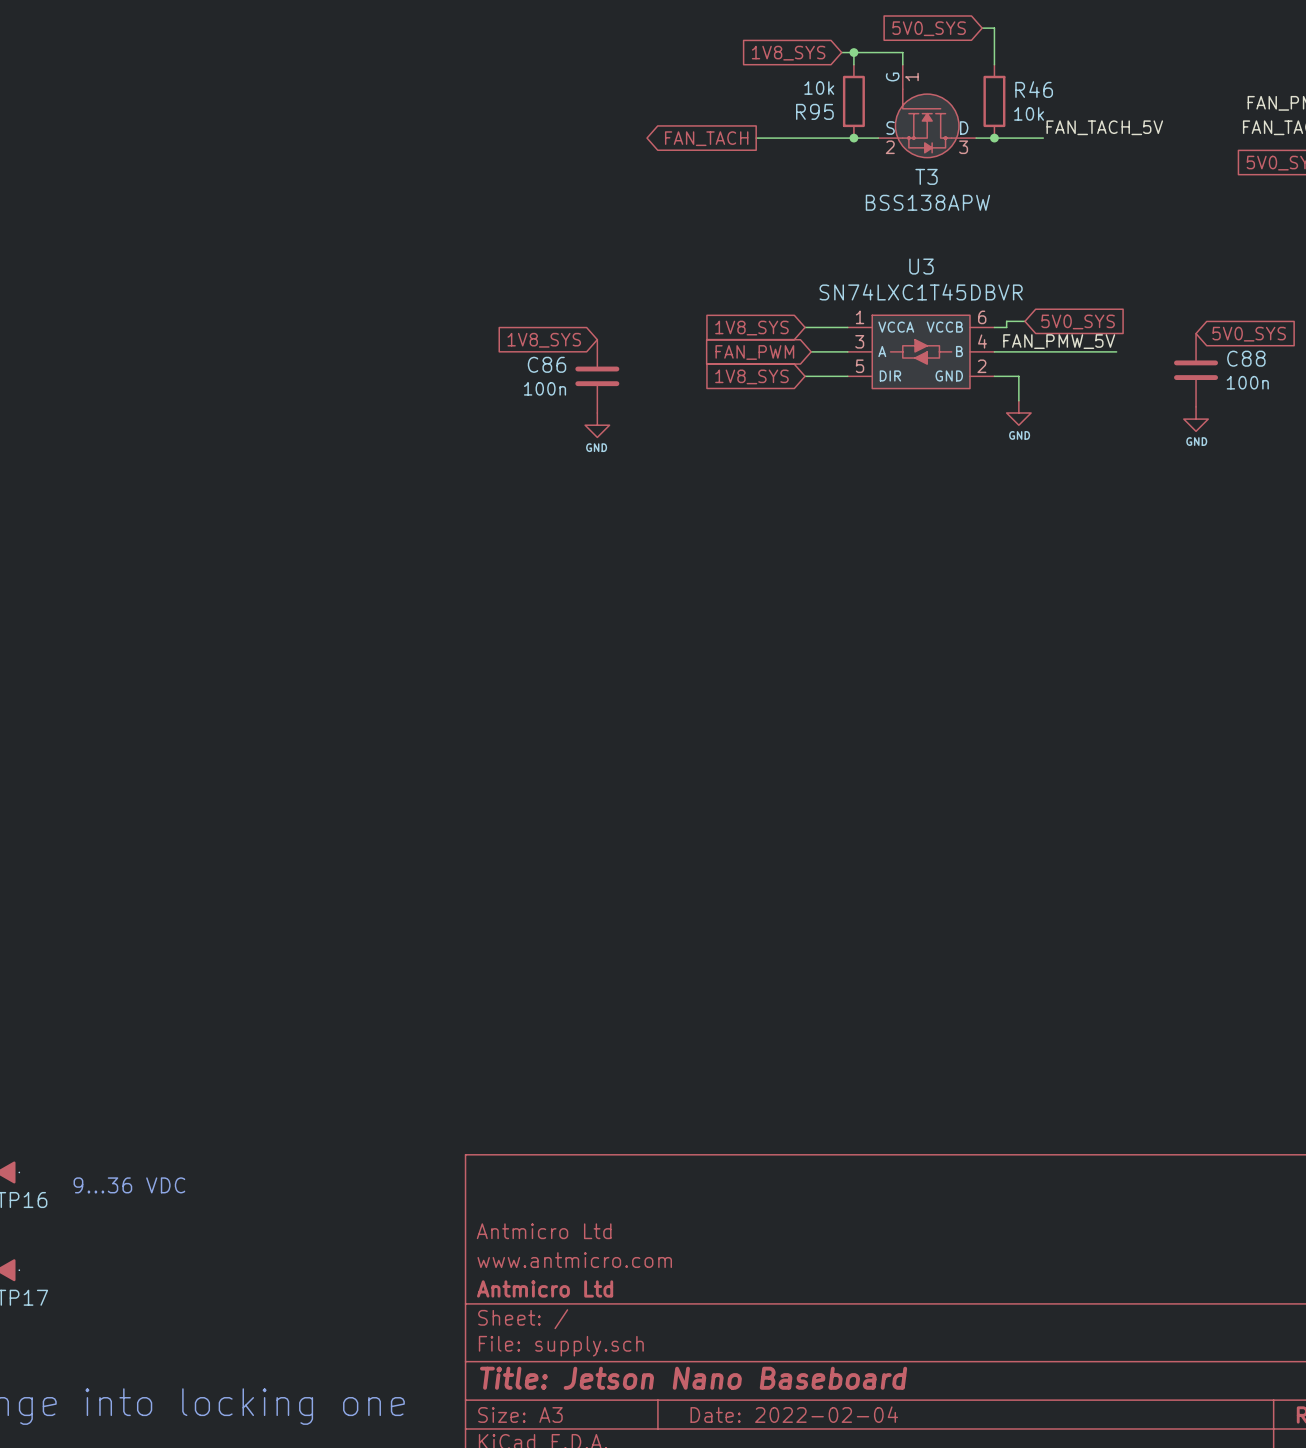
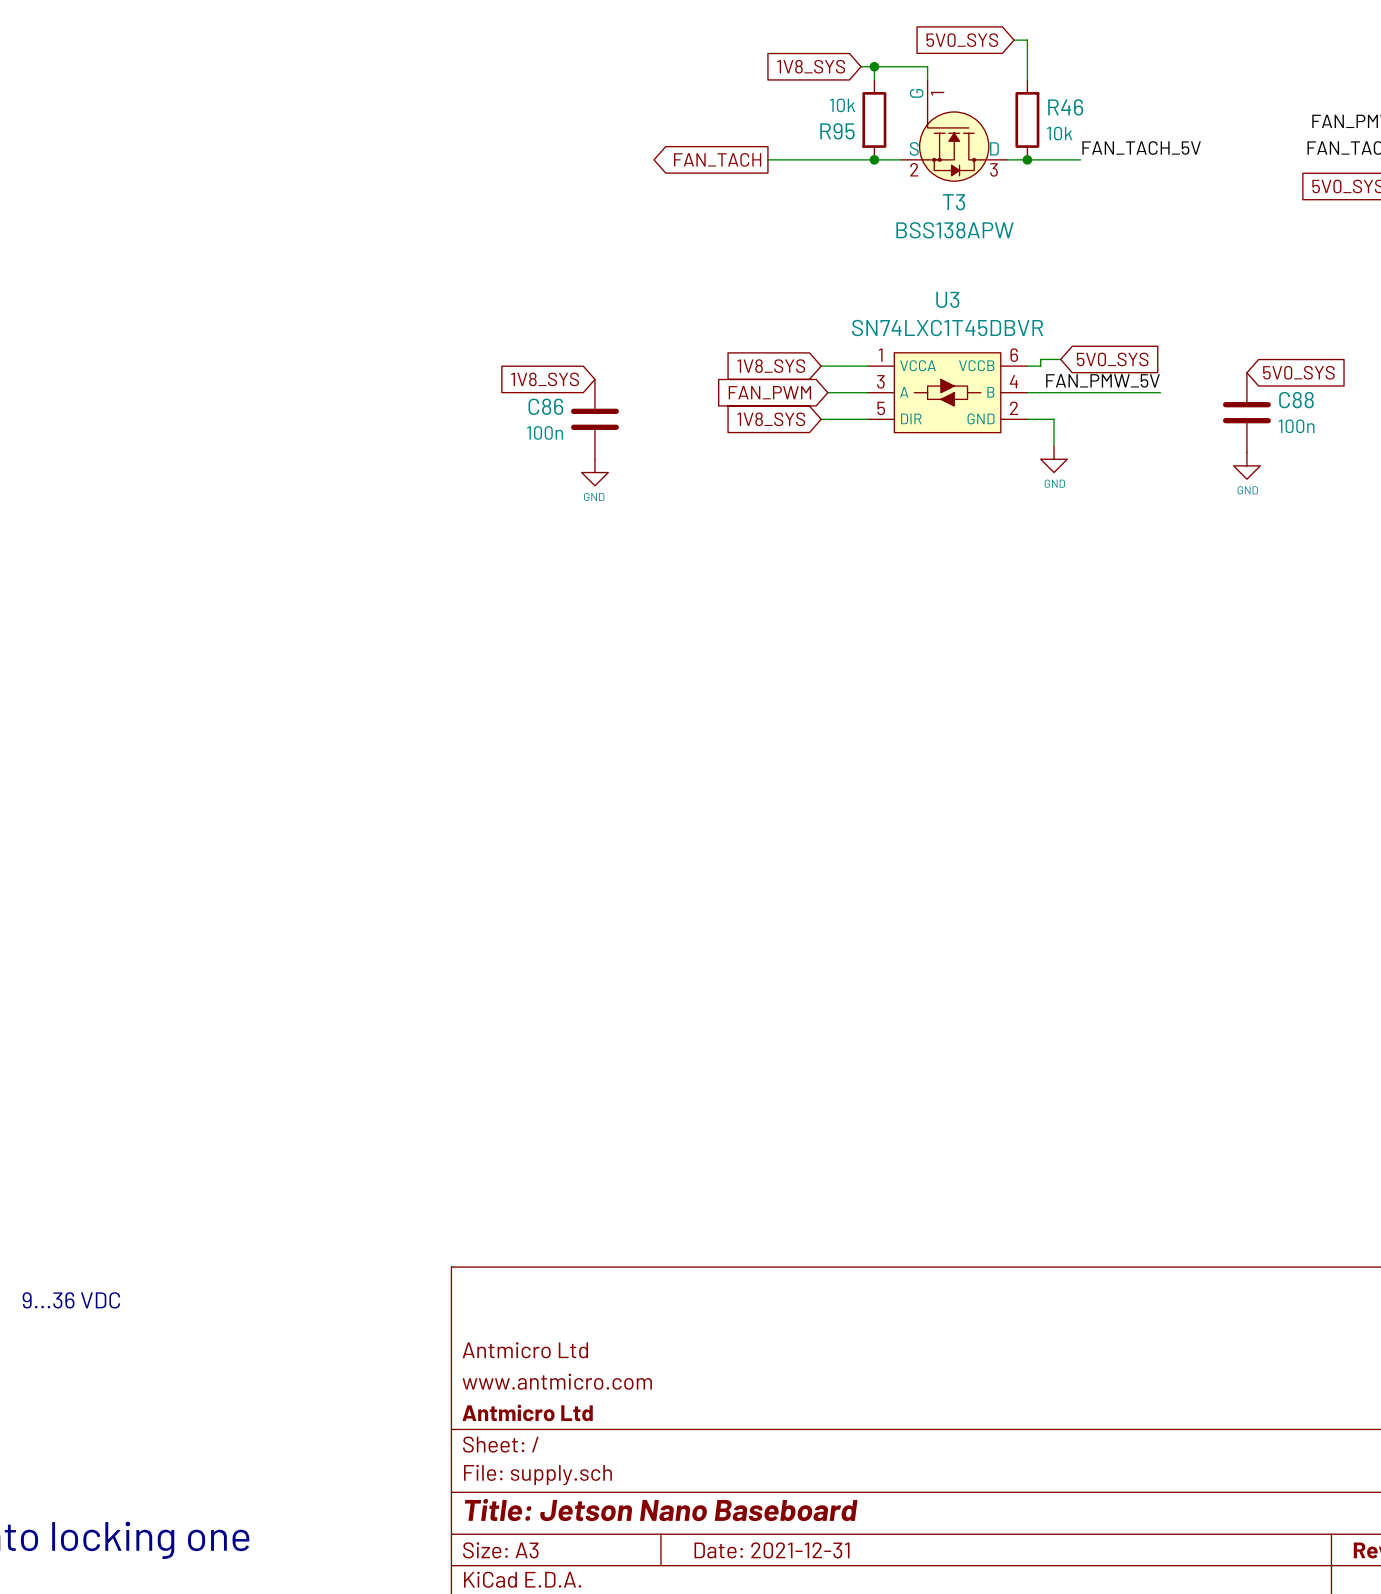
title block: Date: 2022-02-04 (794, 1414) -> Date: 2021-12-31 (772, 1550)

